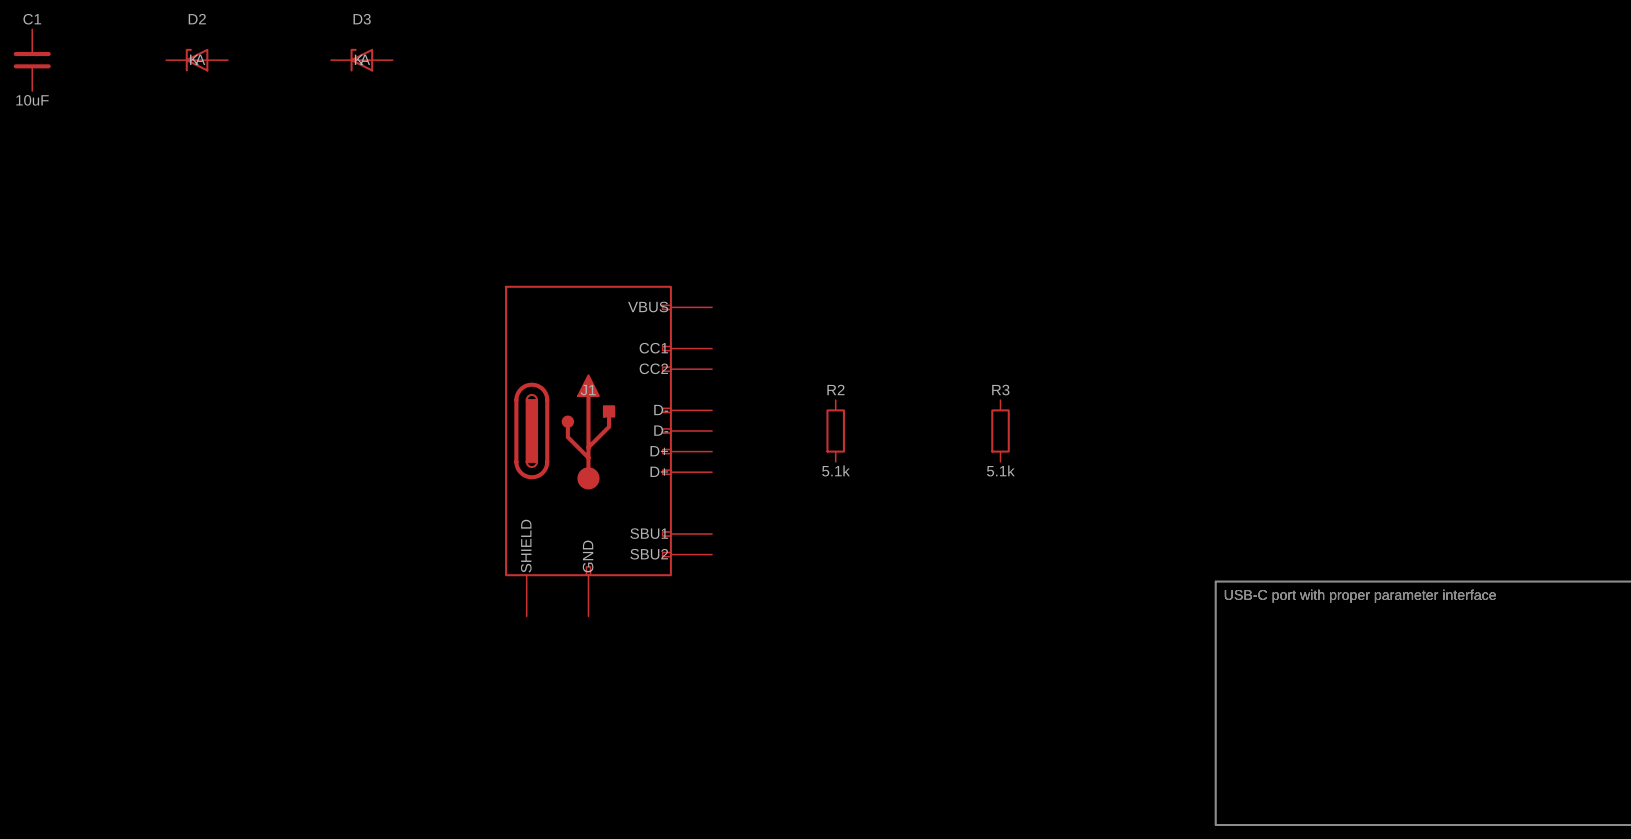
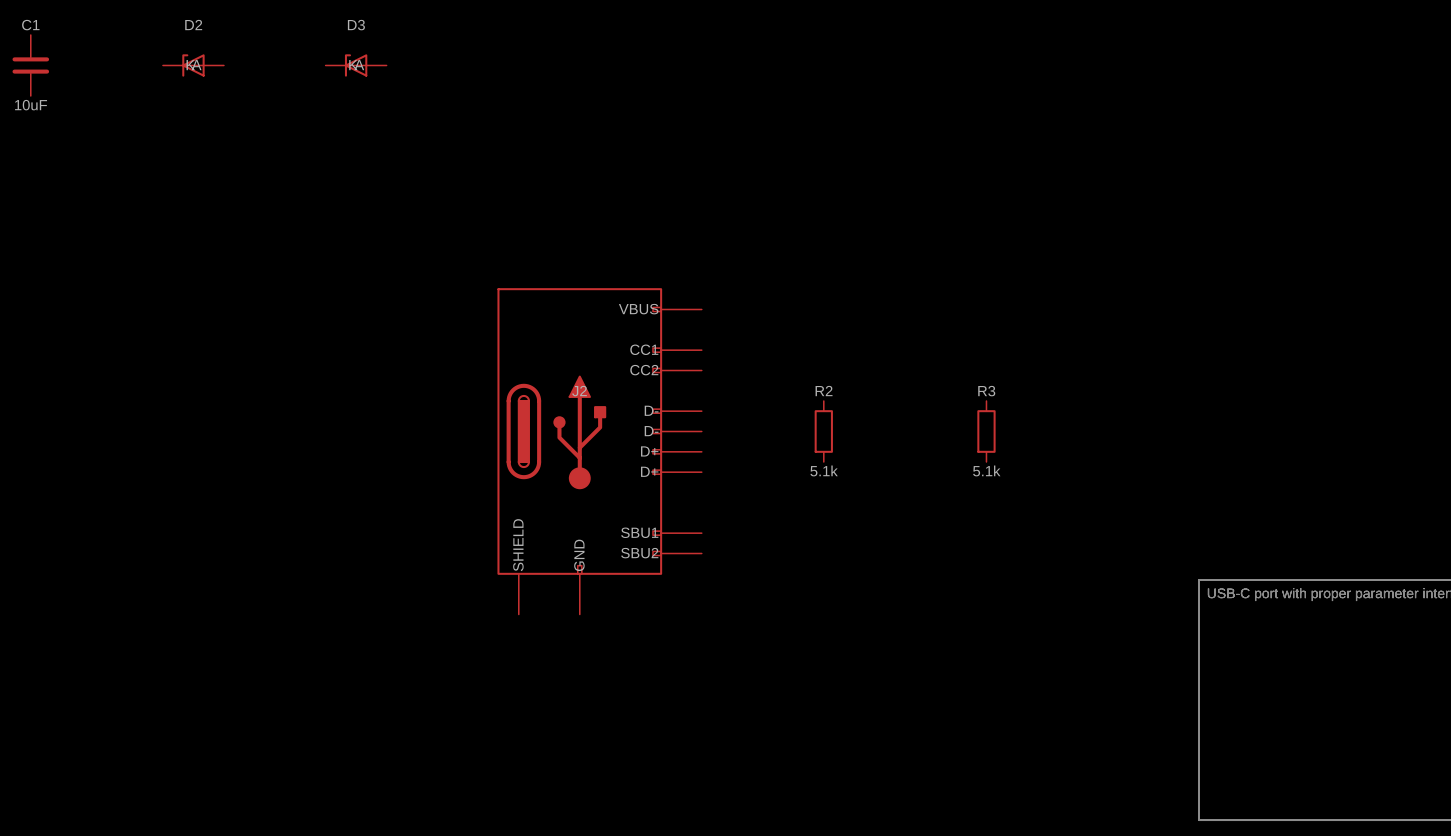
J1 name: J1 (588, 390) -> J2 (579, 391)

